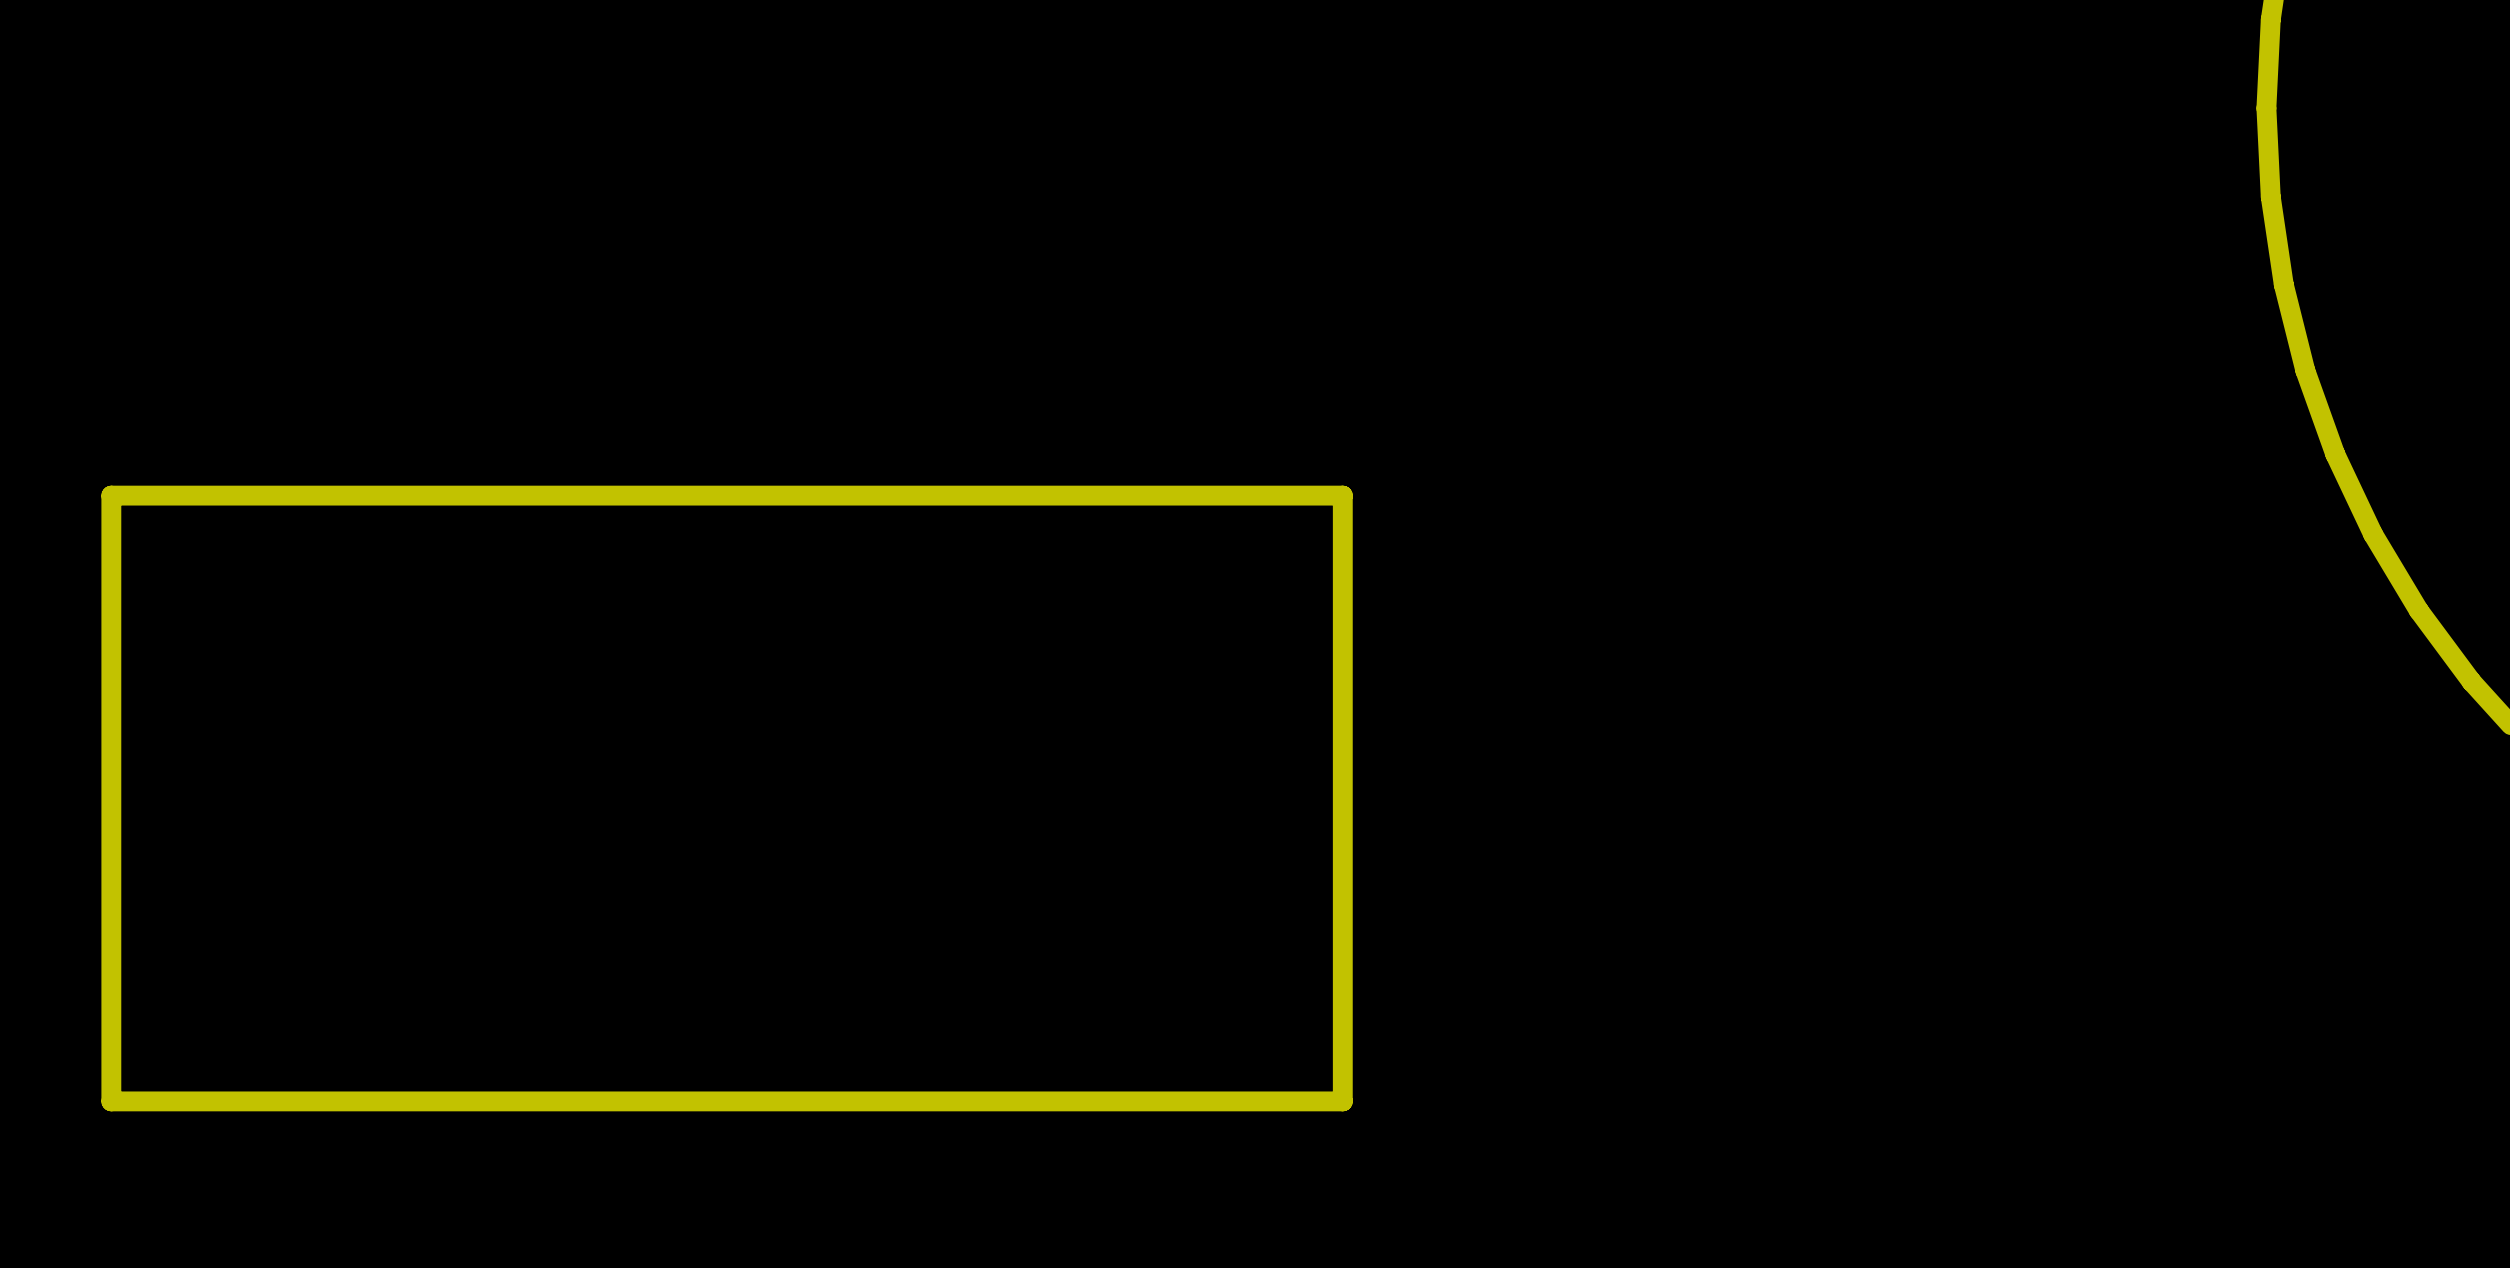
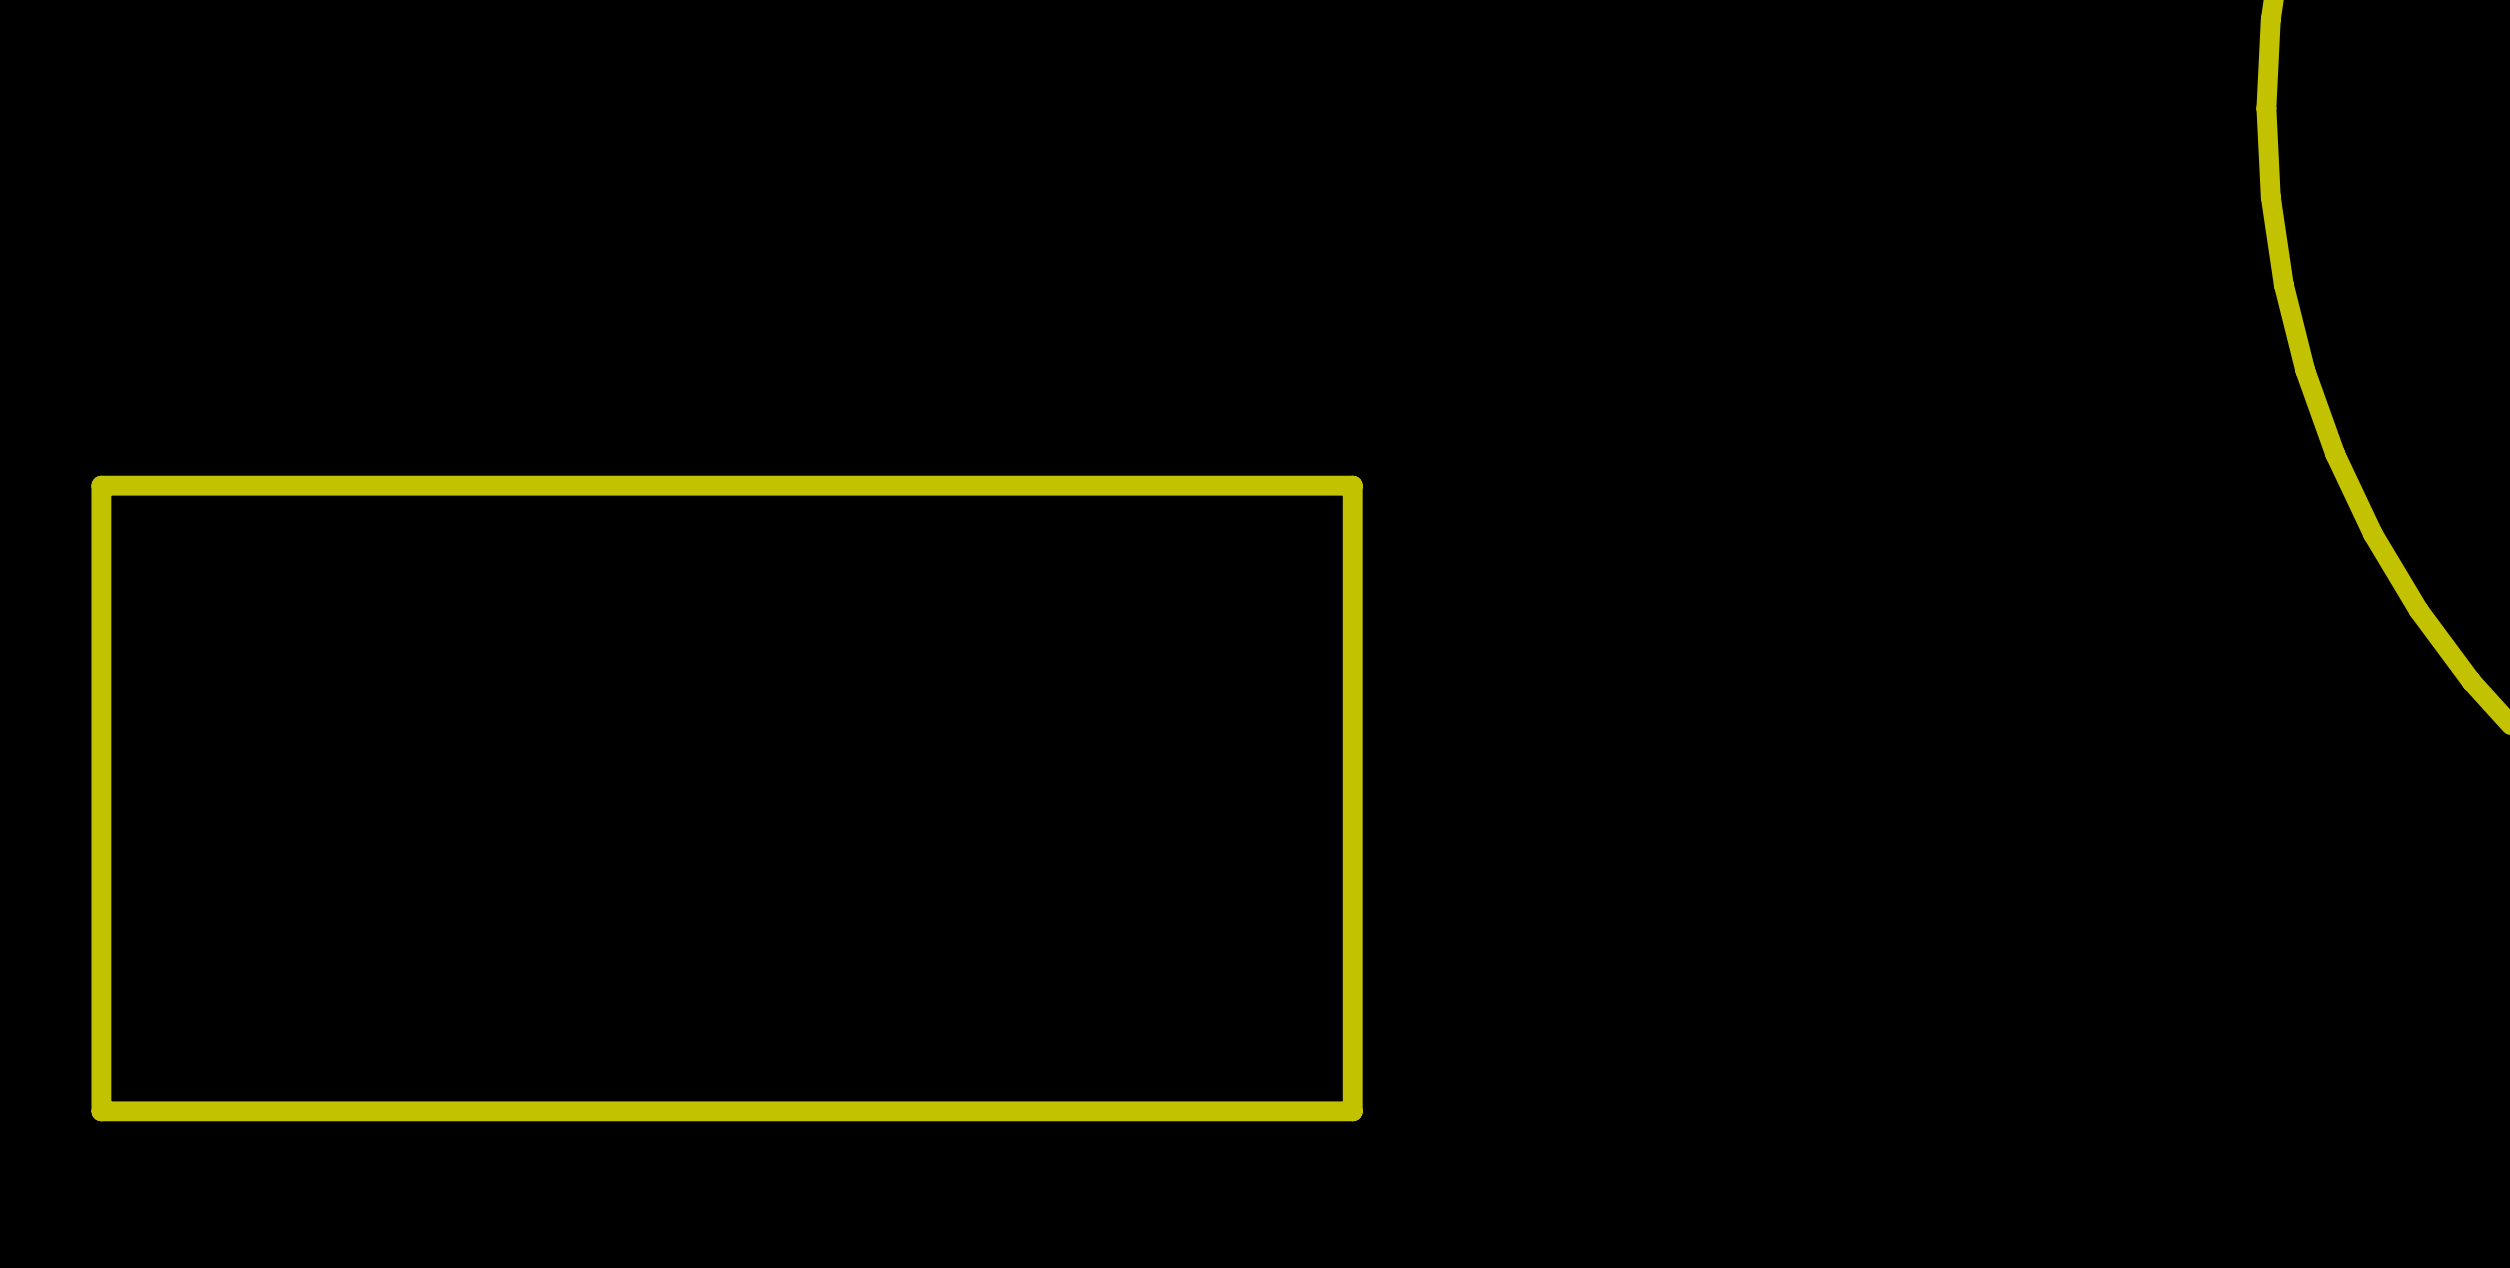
board edge: (1342, 495) (111, 495) (111, 1101) (1342, 1101) (1342, 495) -> (1352, 485) (1352, 1111) (101, 1111) (101, 485) (1352, 485)

